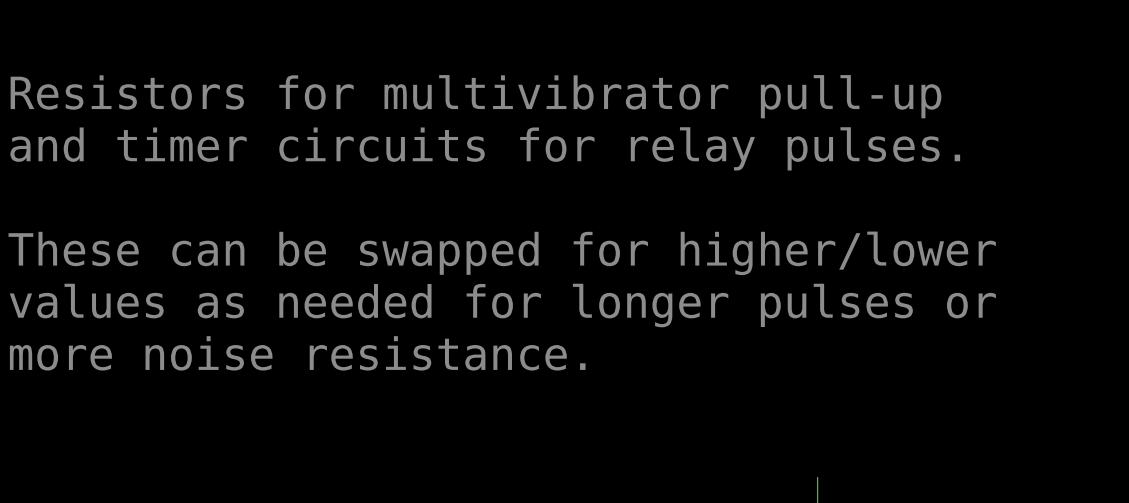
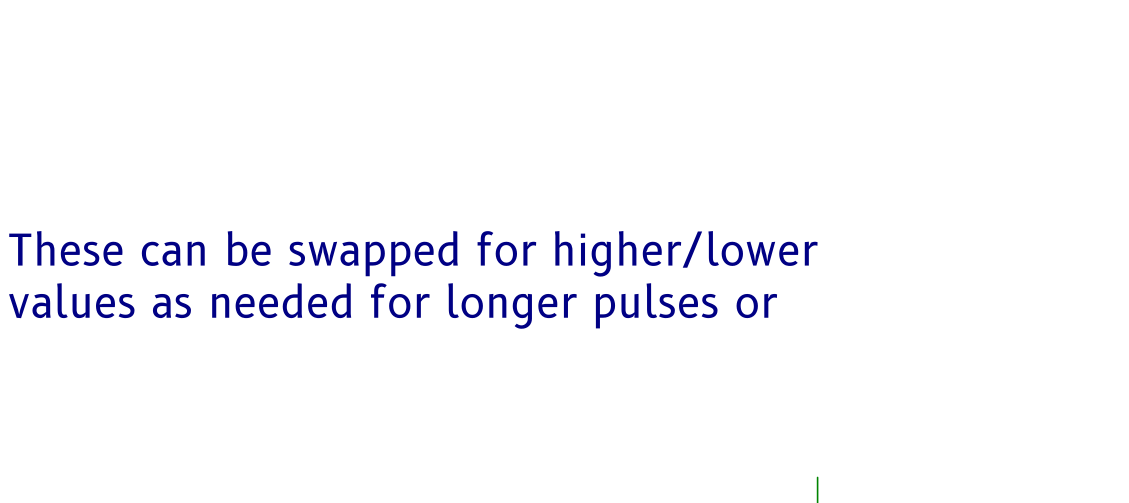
text: Resistors for multivibrator pull-up (475, 96) -> none
text: and timer circuits for relay pulses. (485, 148) -> none
text: more noise resistance. (297, 353) -> none

